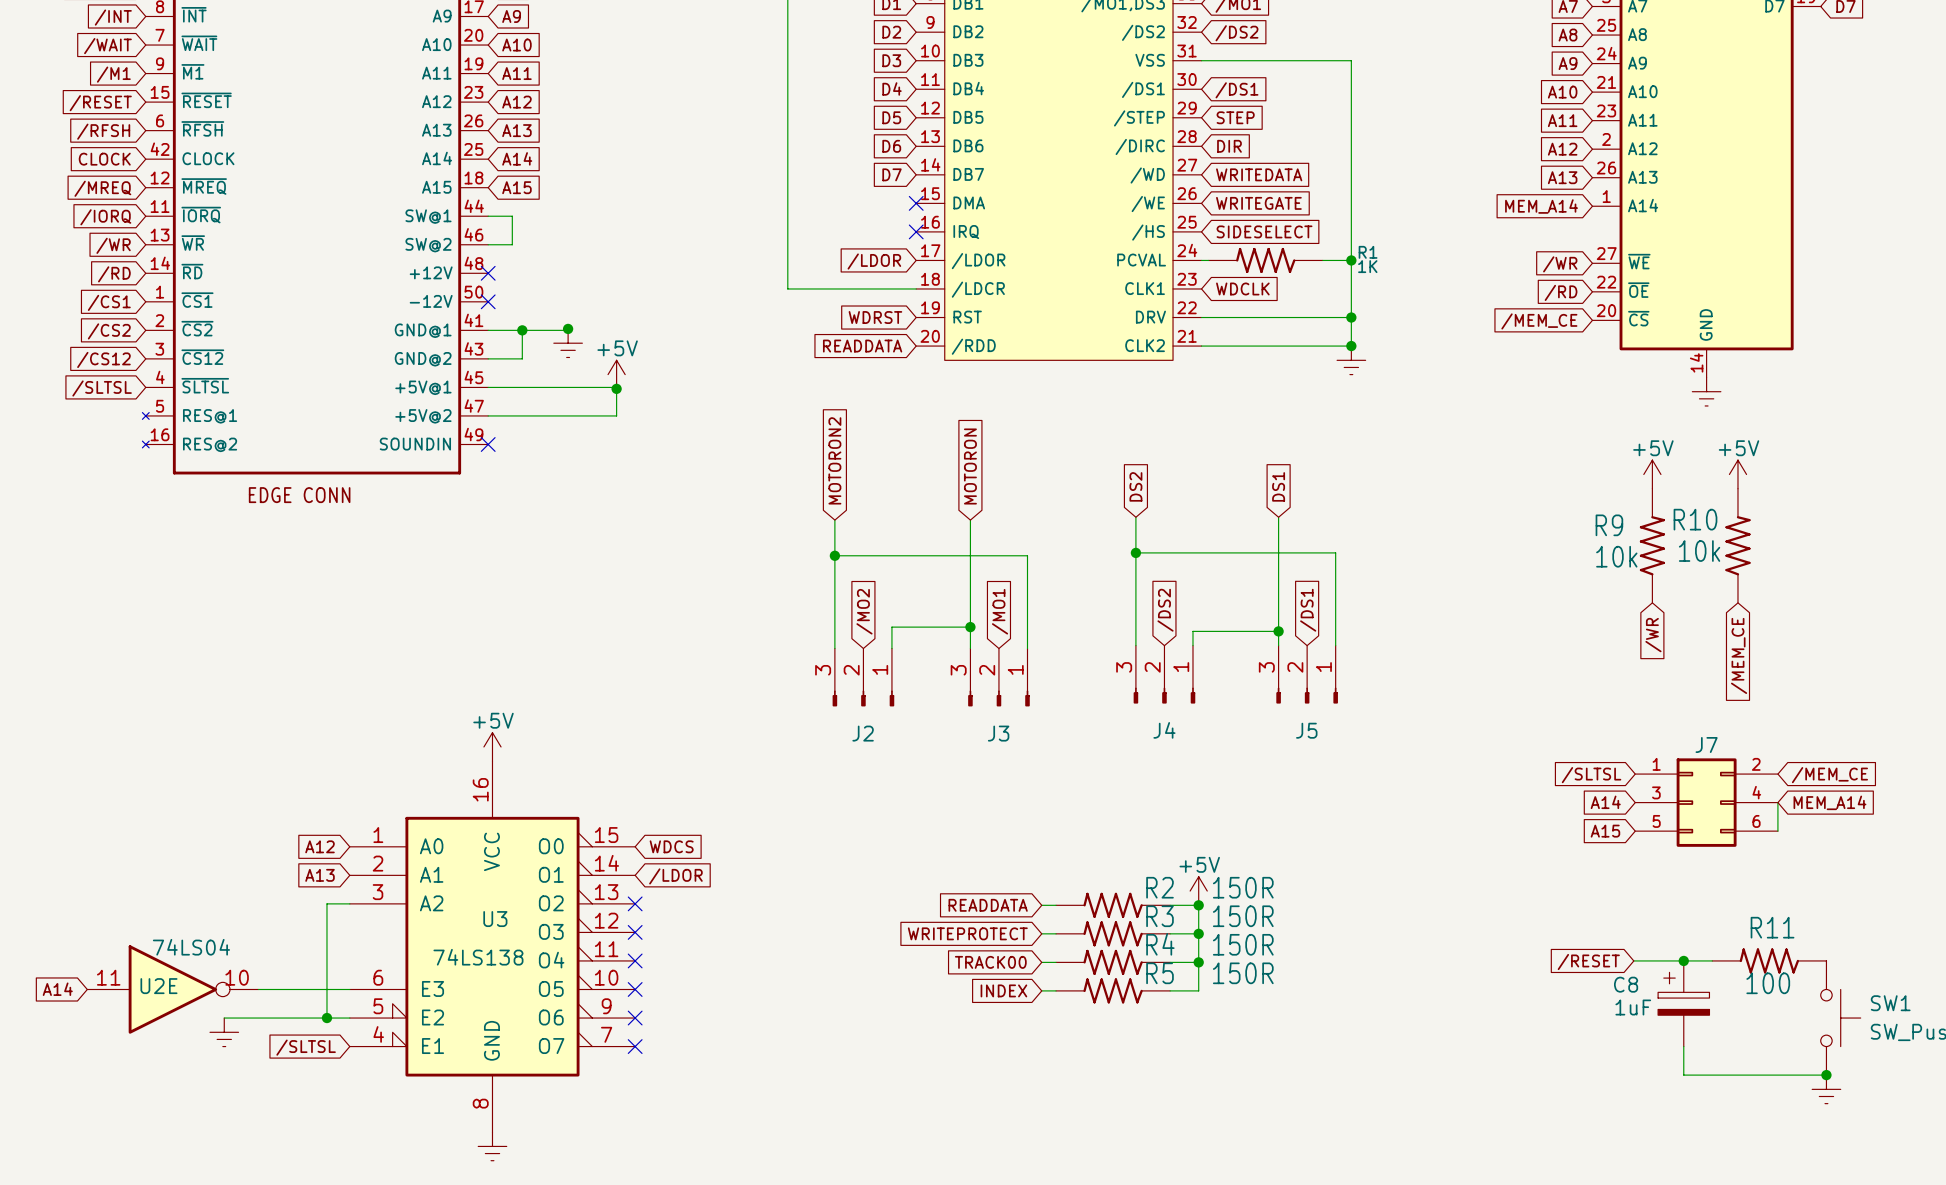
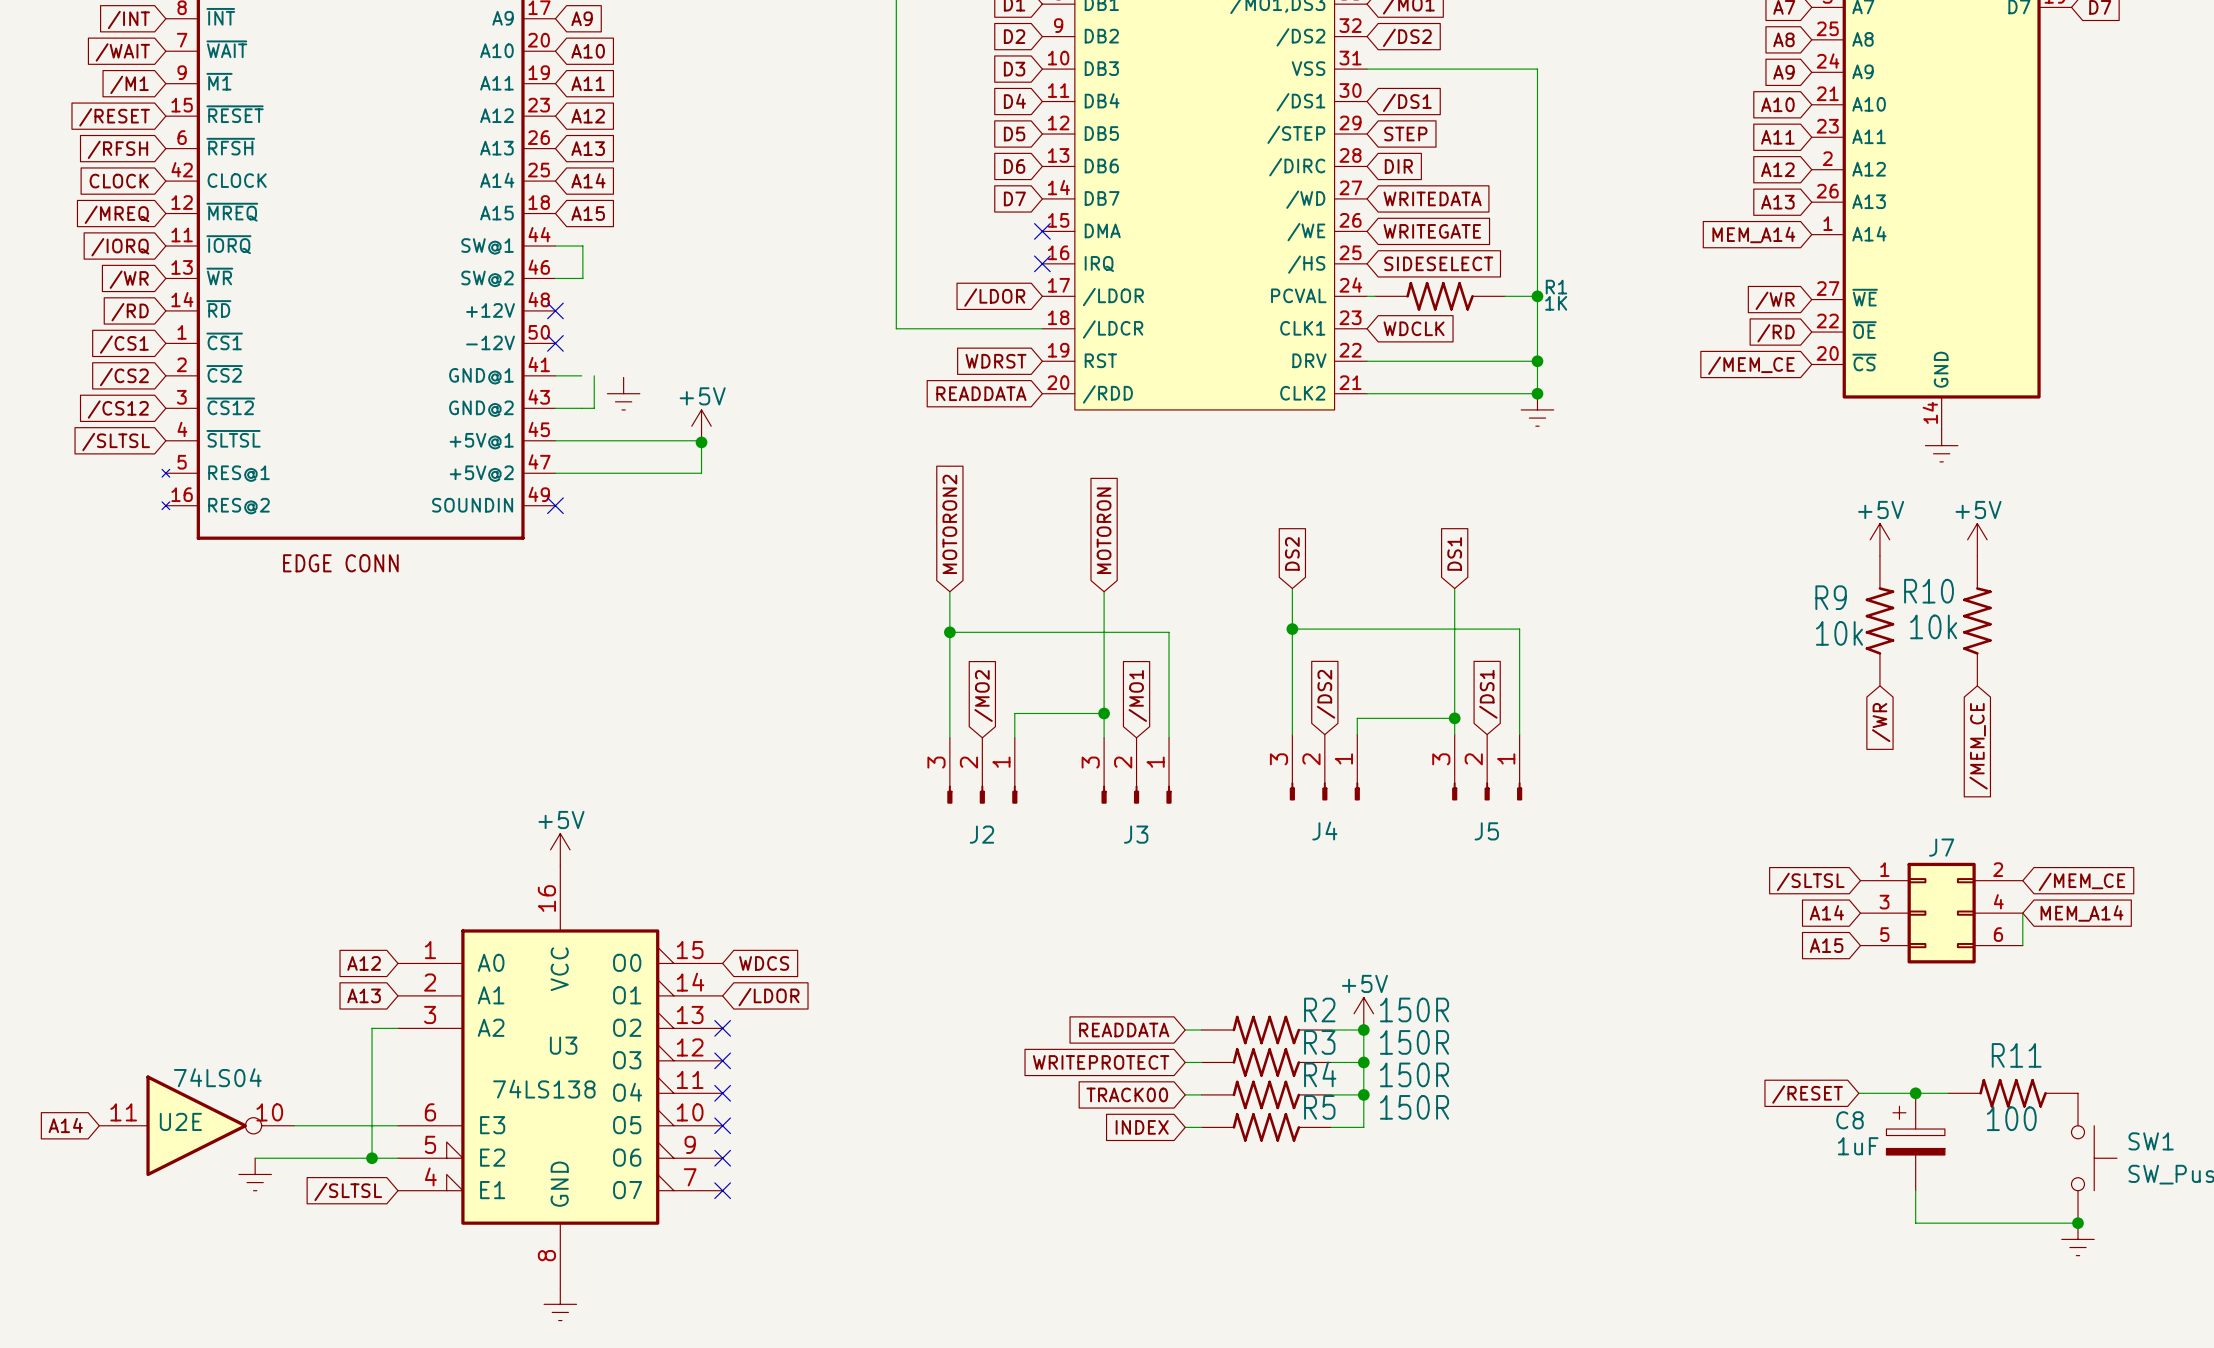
wire: (568, 328) (511, 330) -> none
junction: (568, 328) -> none
junction: (522, 330) -> none
power symbol position: (568, 343) -> (623, 393)

